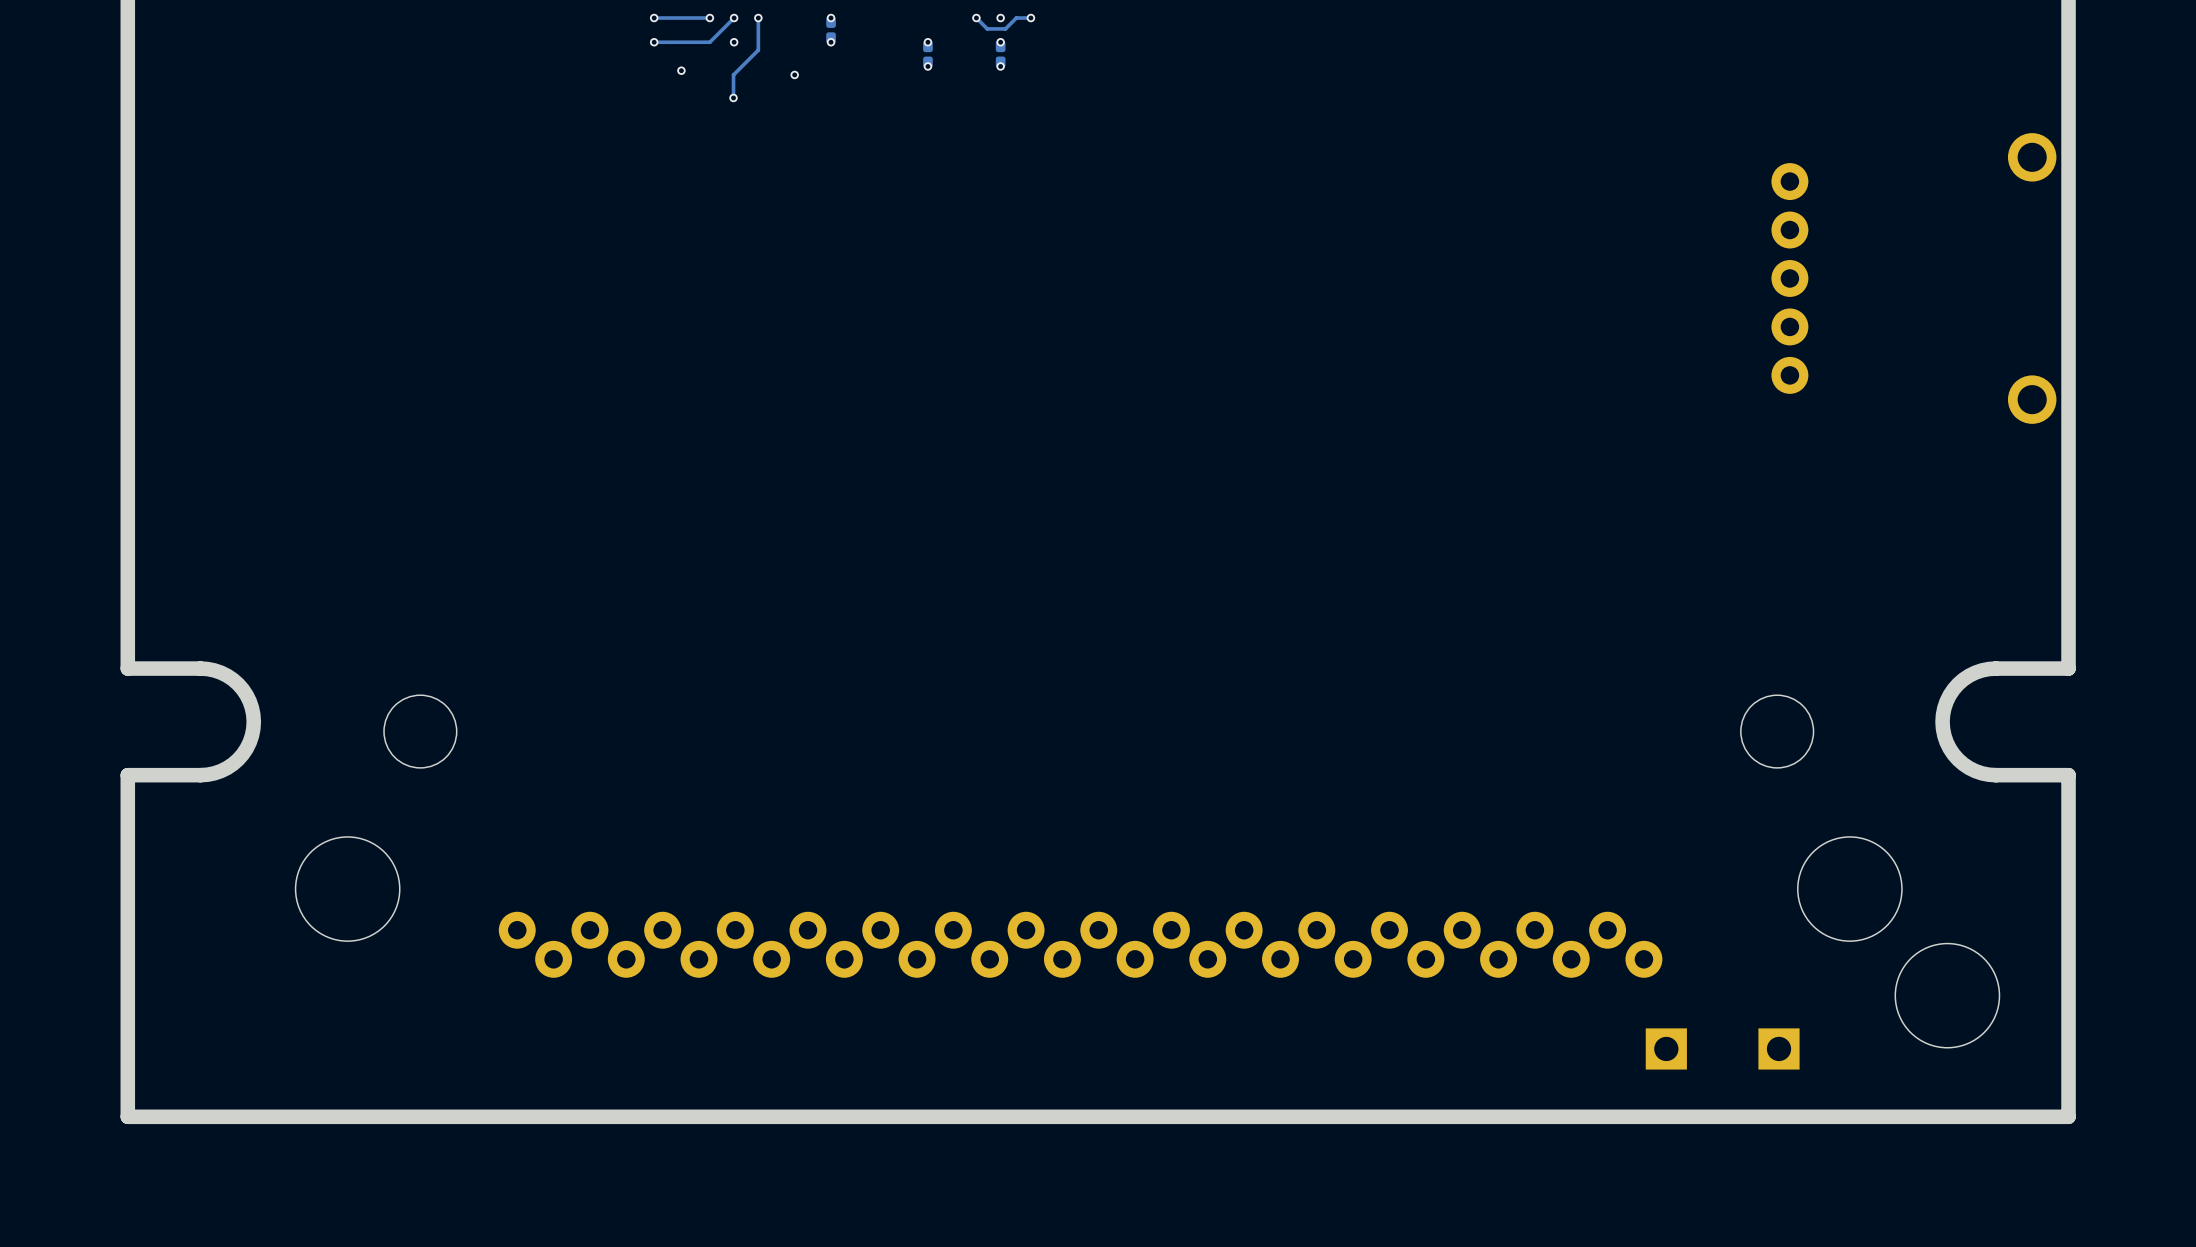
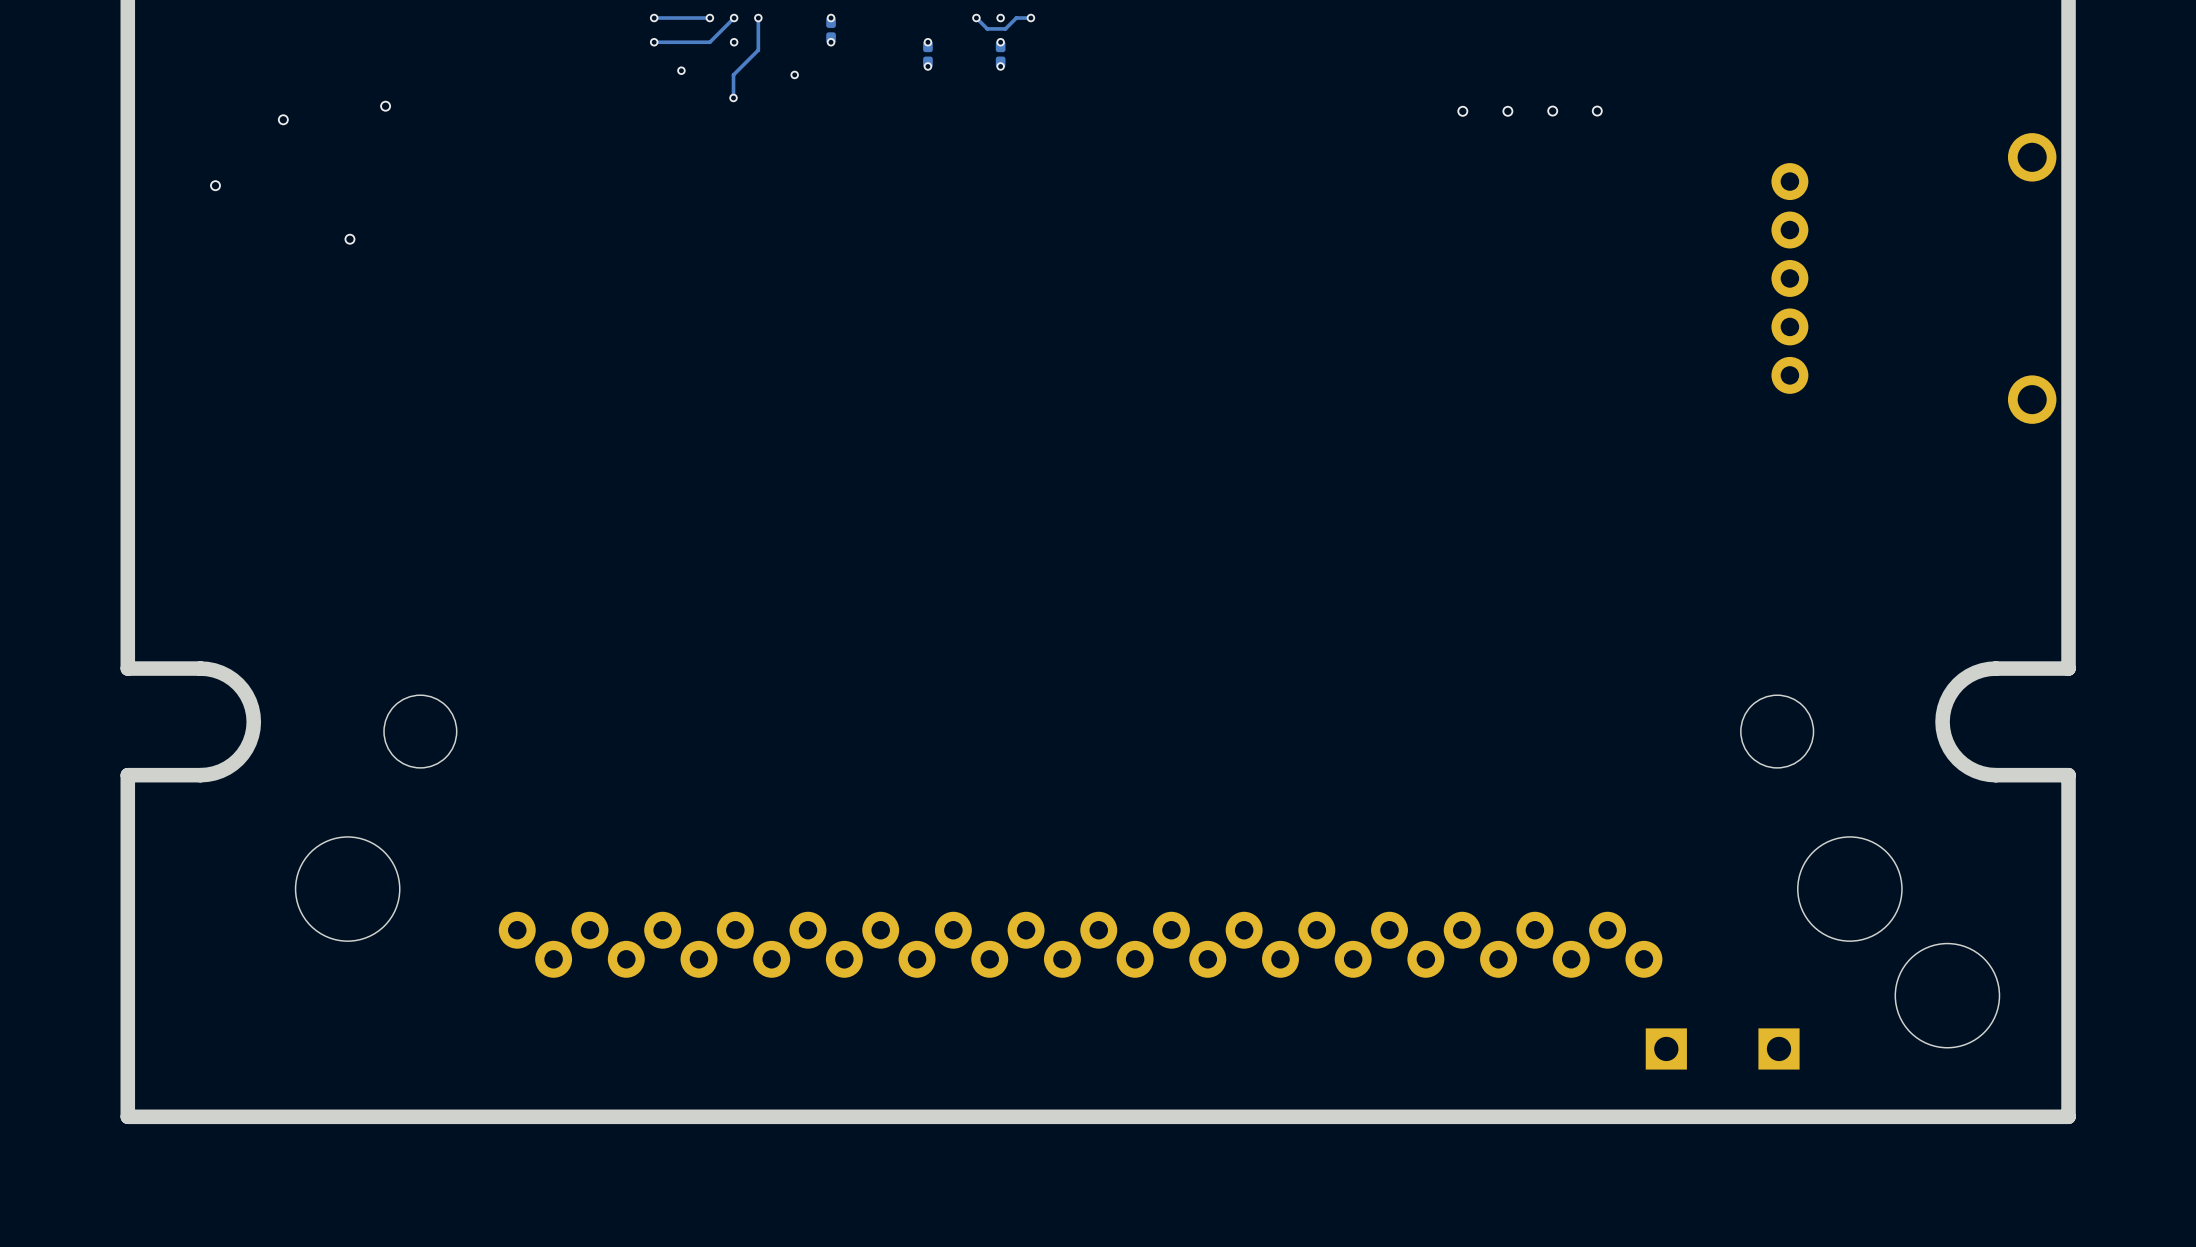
via: none -> (385, 106)
via: none -> (1462, 111)
via: none -> (1507, 111)
via: none -> (1552, 111)
via: none -> (1597, 111)
via: none -> (283, 119)
via: none -> (215, 185)
via: none -> (349, 239)

